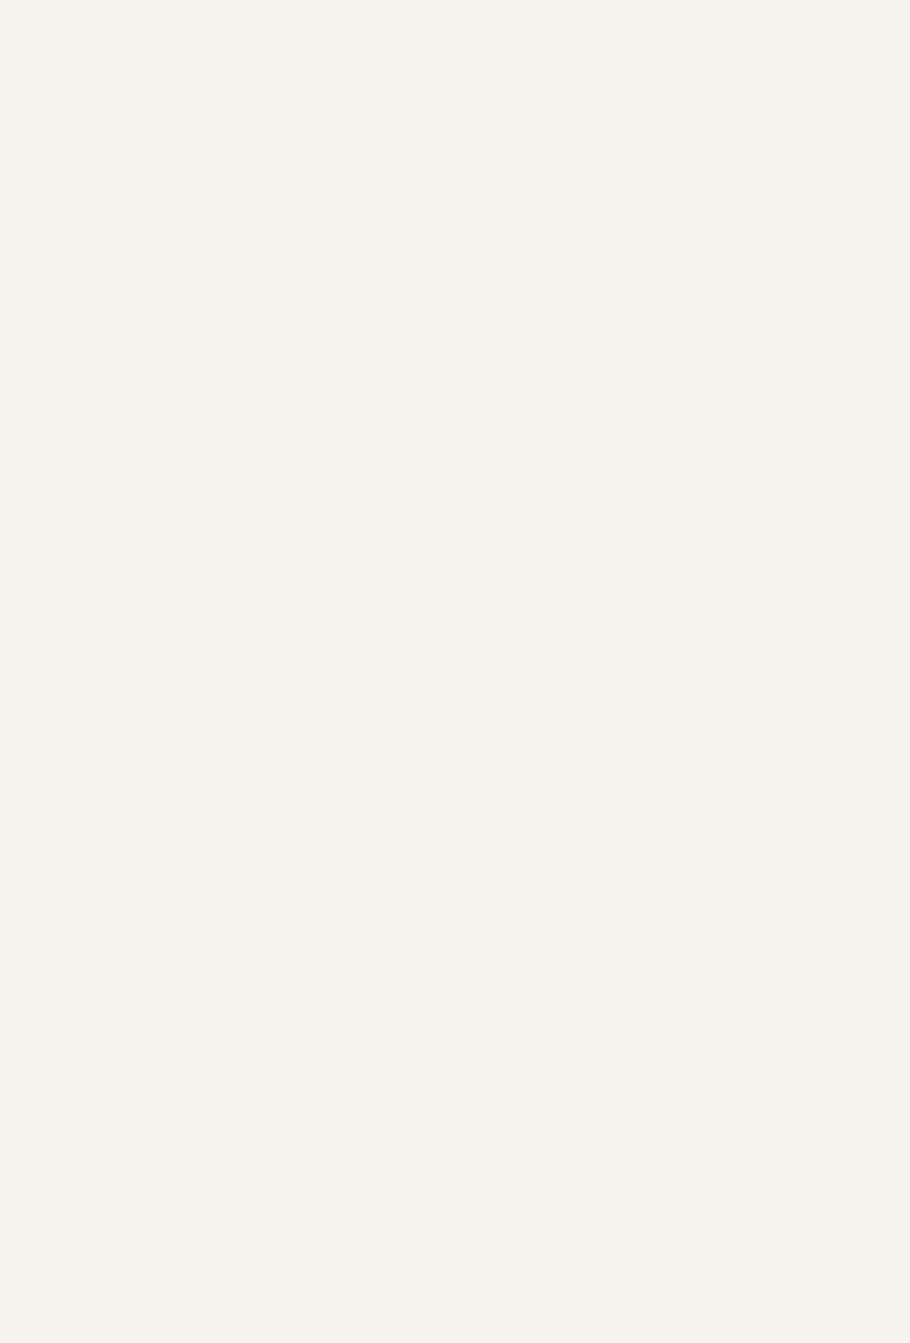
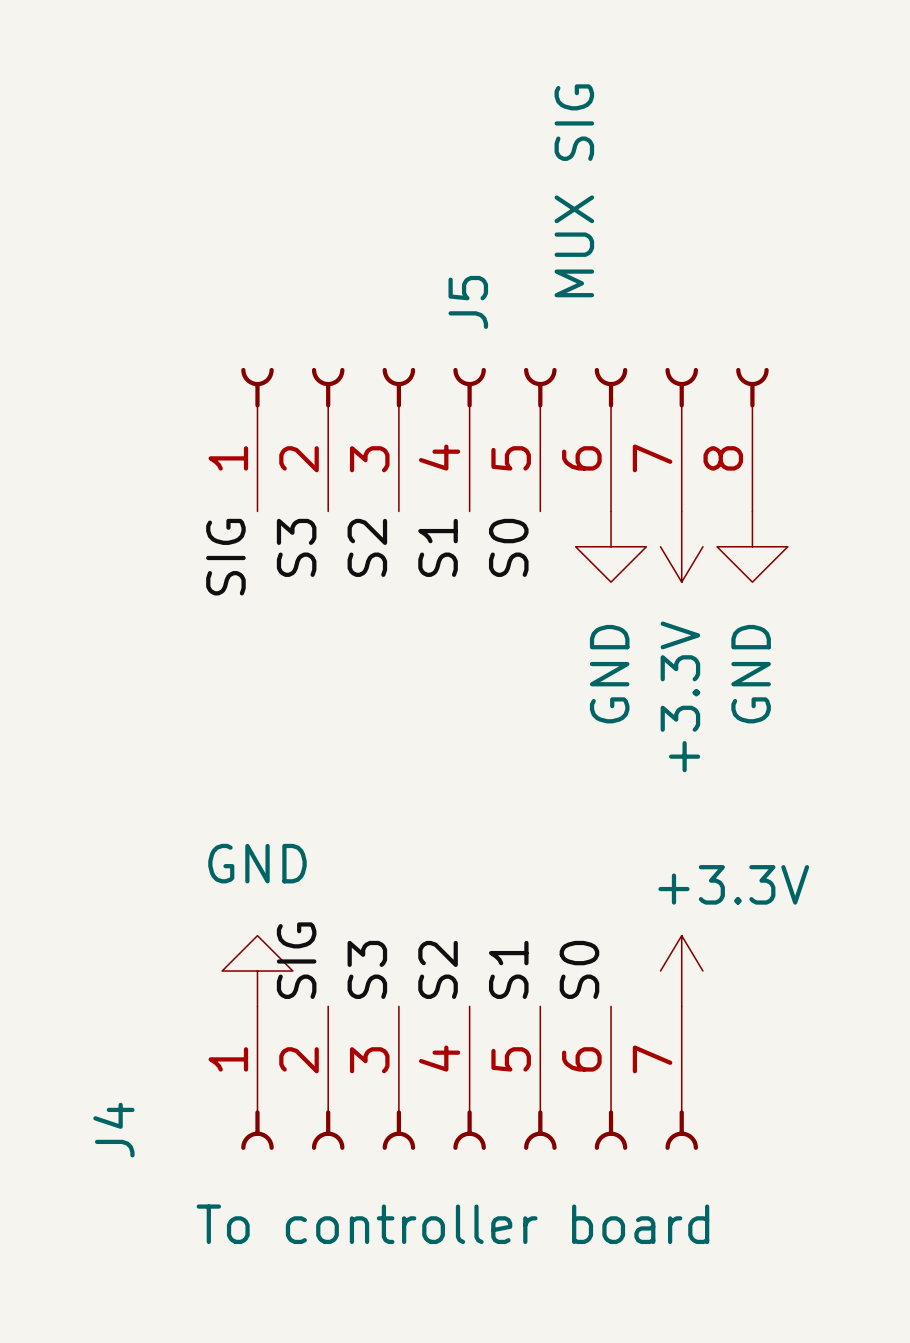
J5: none -> MUX SIG (504, 439)
power symbol: none -> GND (611, 546)
power symbol: none -> +3.3V (681, 546)
power symbol: none -> GND (752, 546)
label: none -> S3 (296, 547)
label: none -> S2 (367, 547)
label: none -> S1 (438, 547)
label: none -> S0 (508, 547)
label: none -> SIG (225, 557)
label: none -> SIG (296, 960)
label: none -> S3 (367, 969)
label: none -> S2 (438, 969)
label: none -> S1 (508, 969)
label: none -> S0 (579, 969)
power symbol: none -> GND (257, 971)
power symbol: none -> +3.3V (681, 971)
J4: none -> To controller board (469, 1078)

